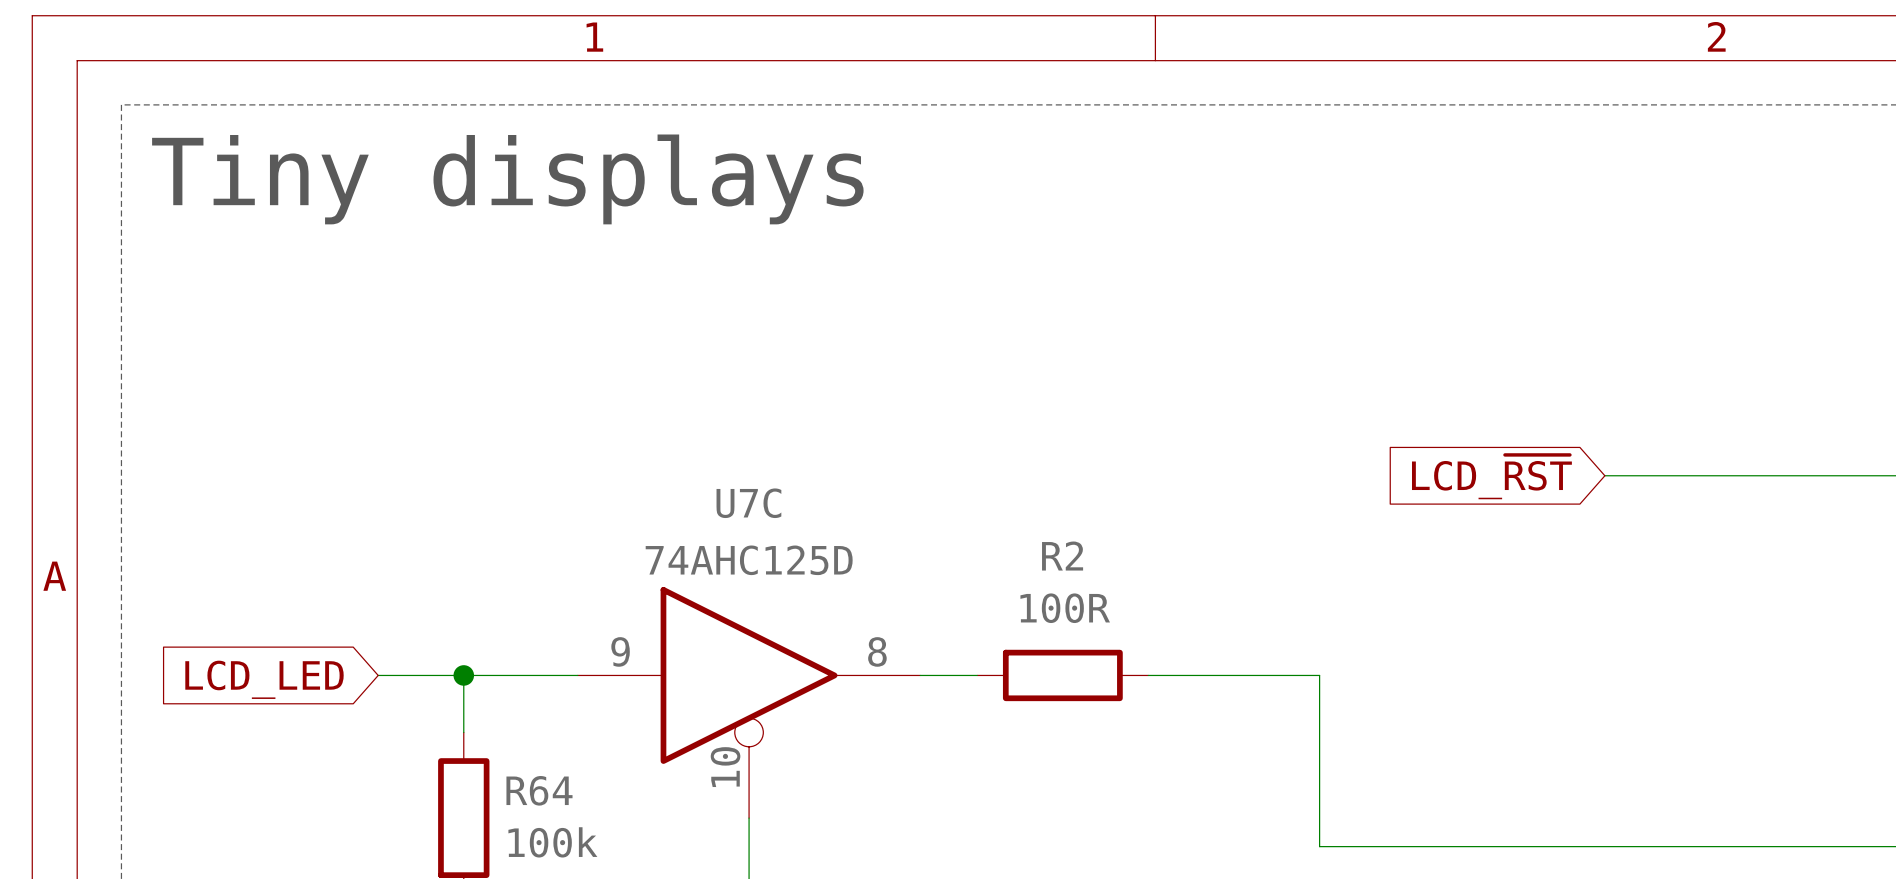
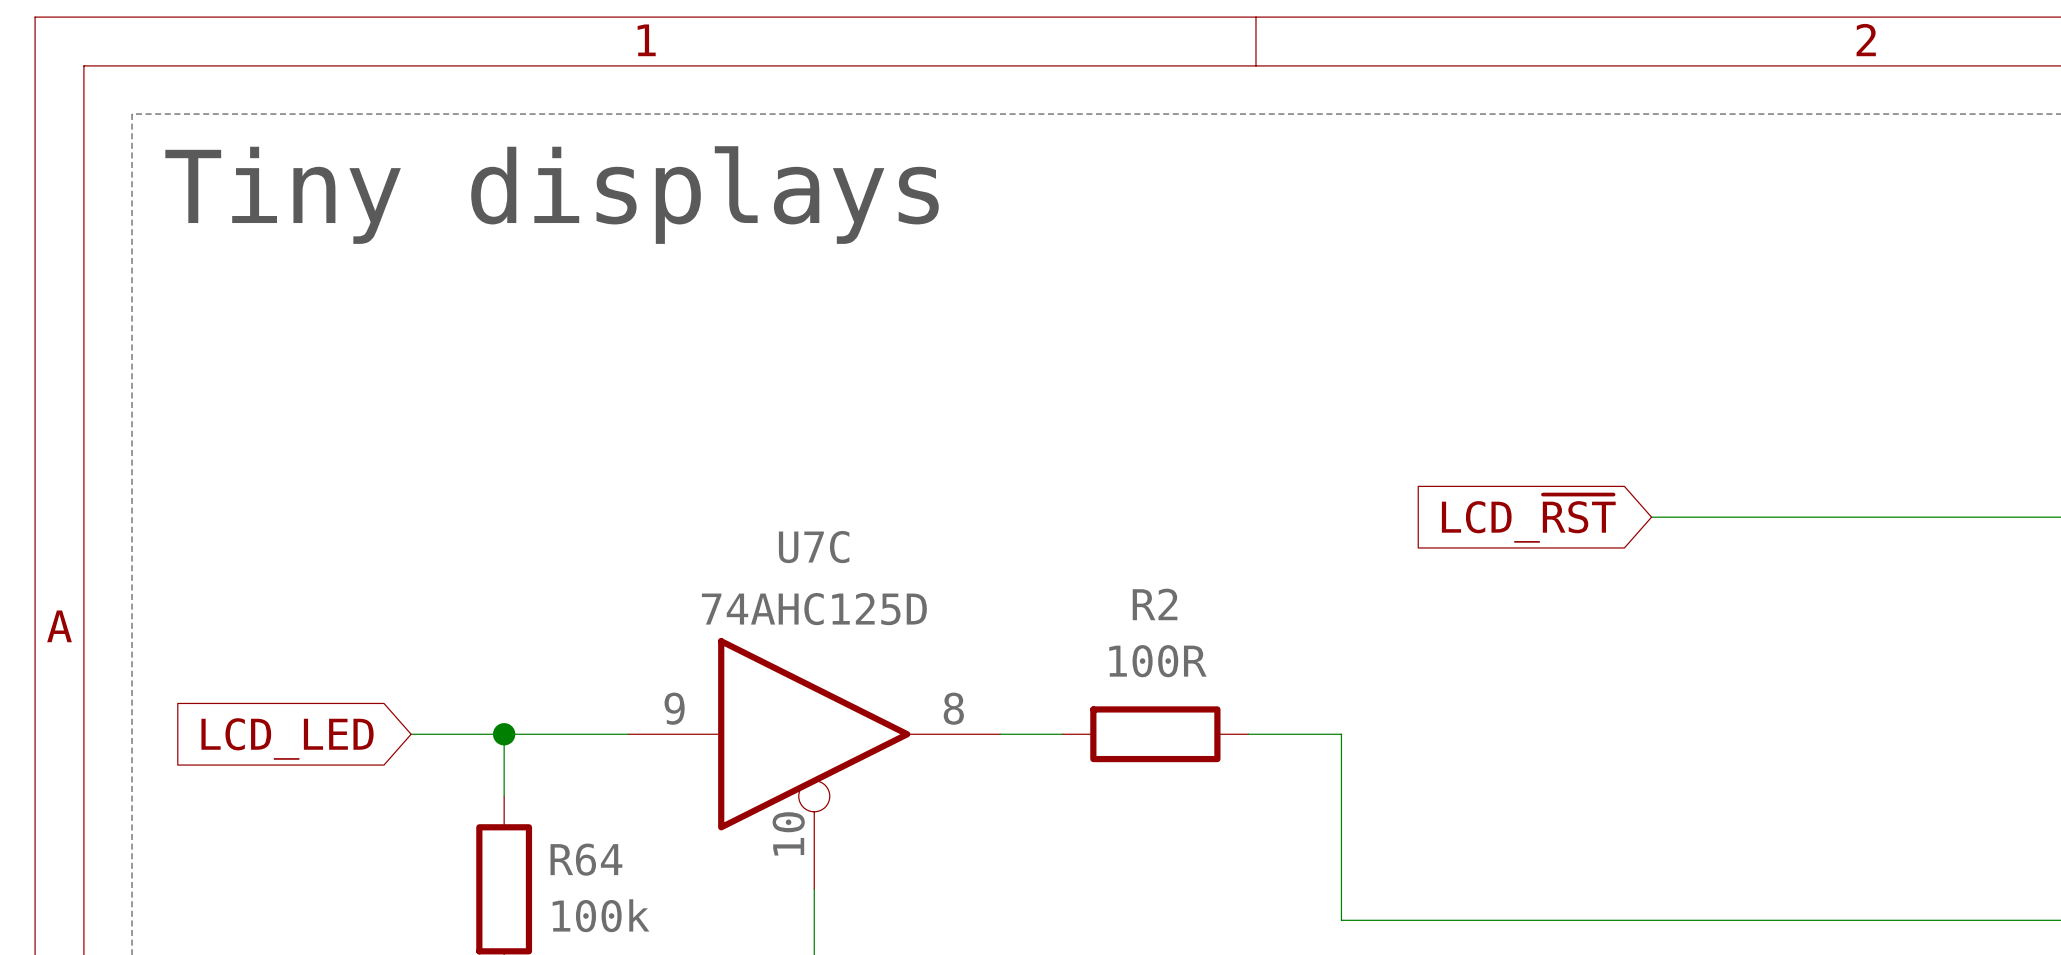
wire: none -> (1651, 517) (1744, 517)
global label position: LCD_~{RST} (1491, 477) -> LCD_~{RST} (1528, 518)
wire: (1234, 675) (1319, 675) (1319, 846) -> (1341, 734) (1341, 920) (1434, 920)

